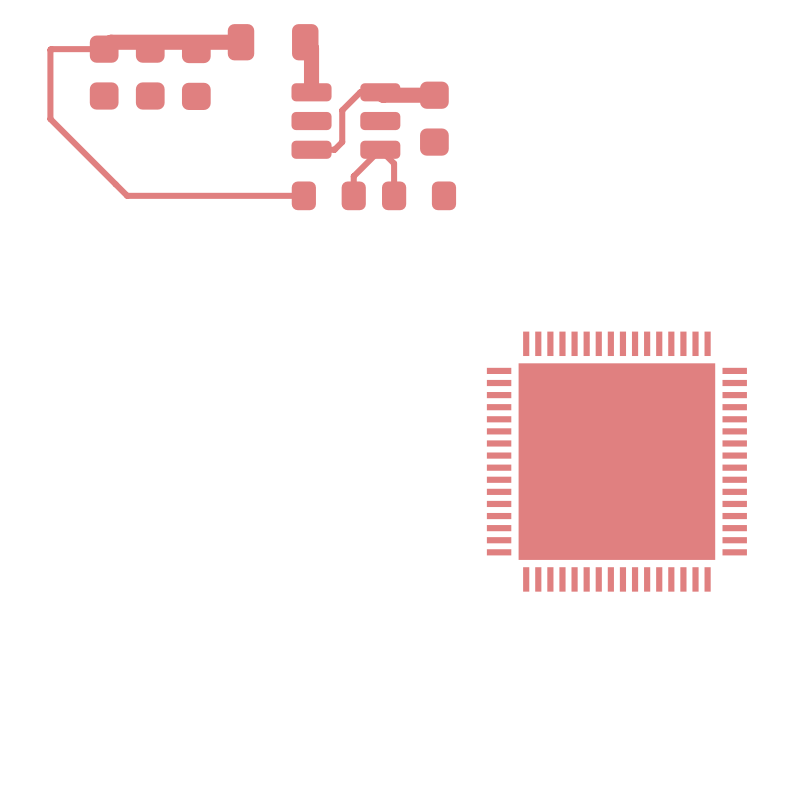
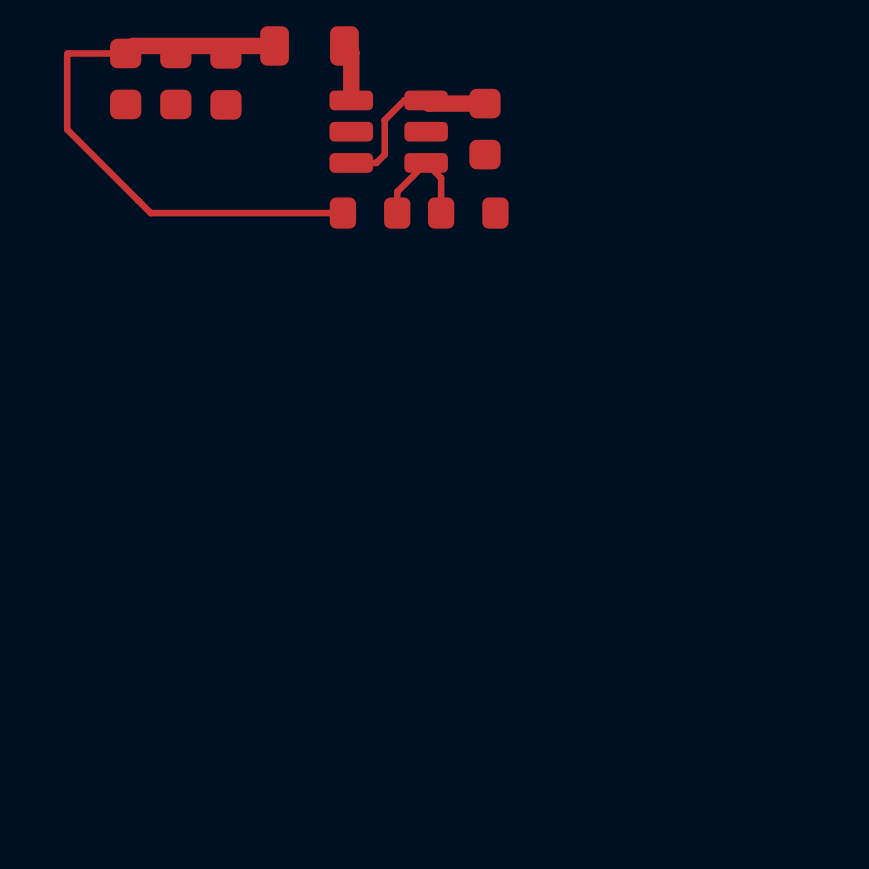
part: (616, 461) -> none

